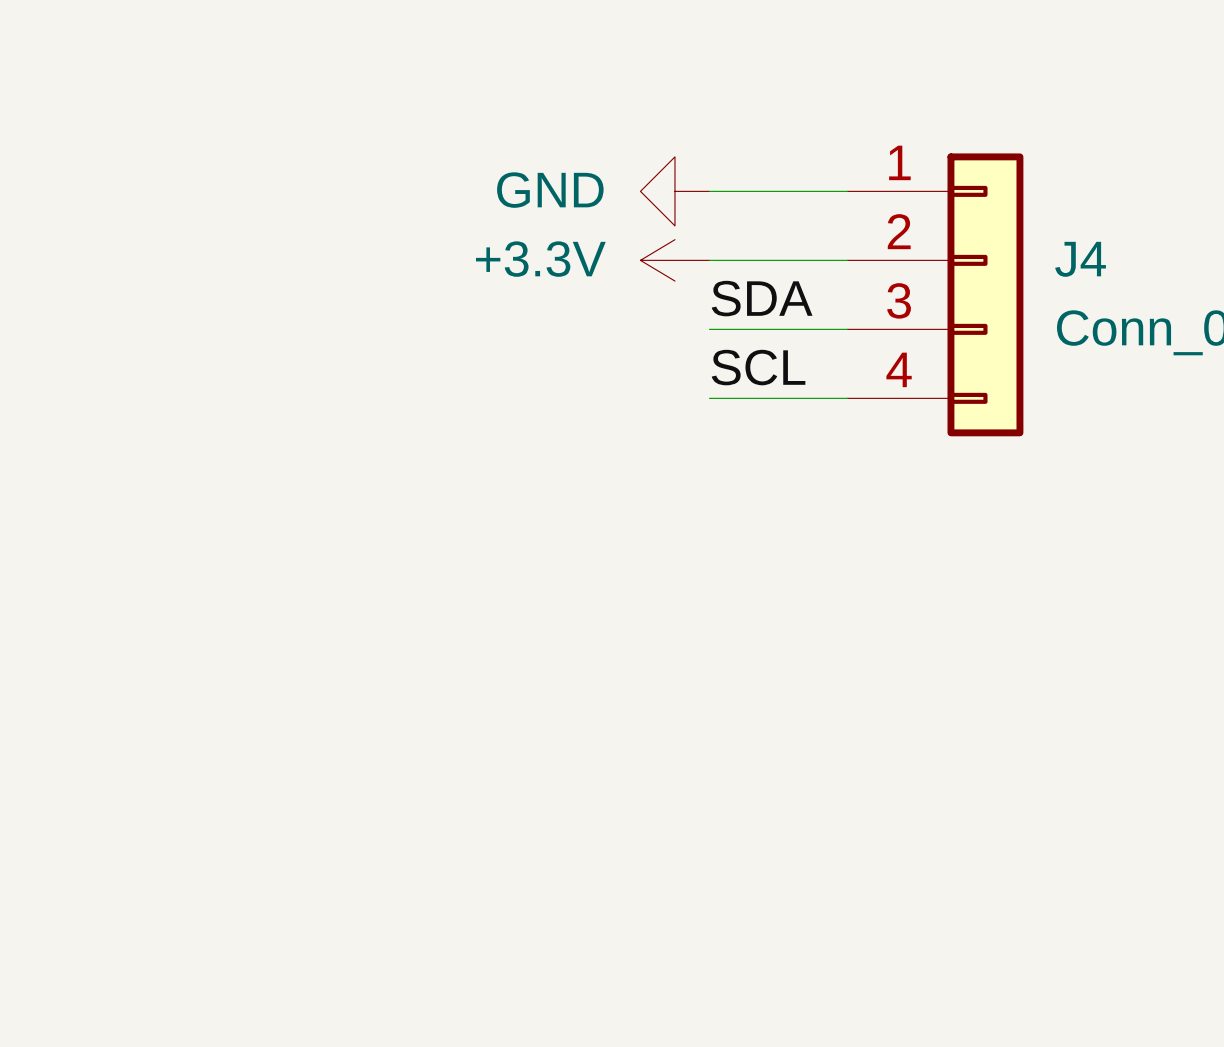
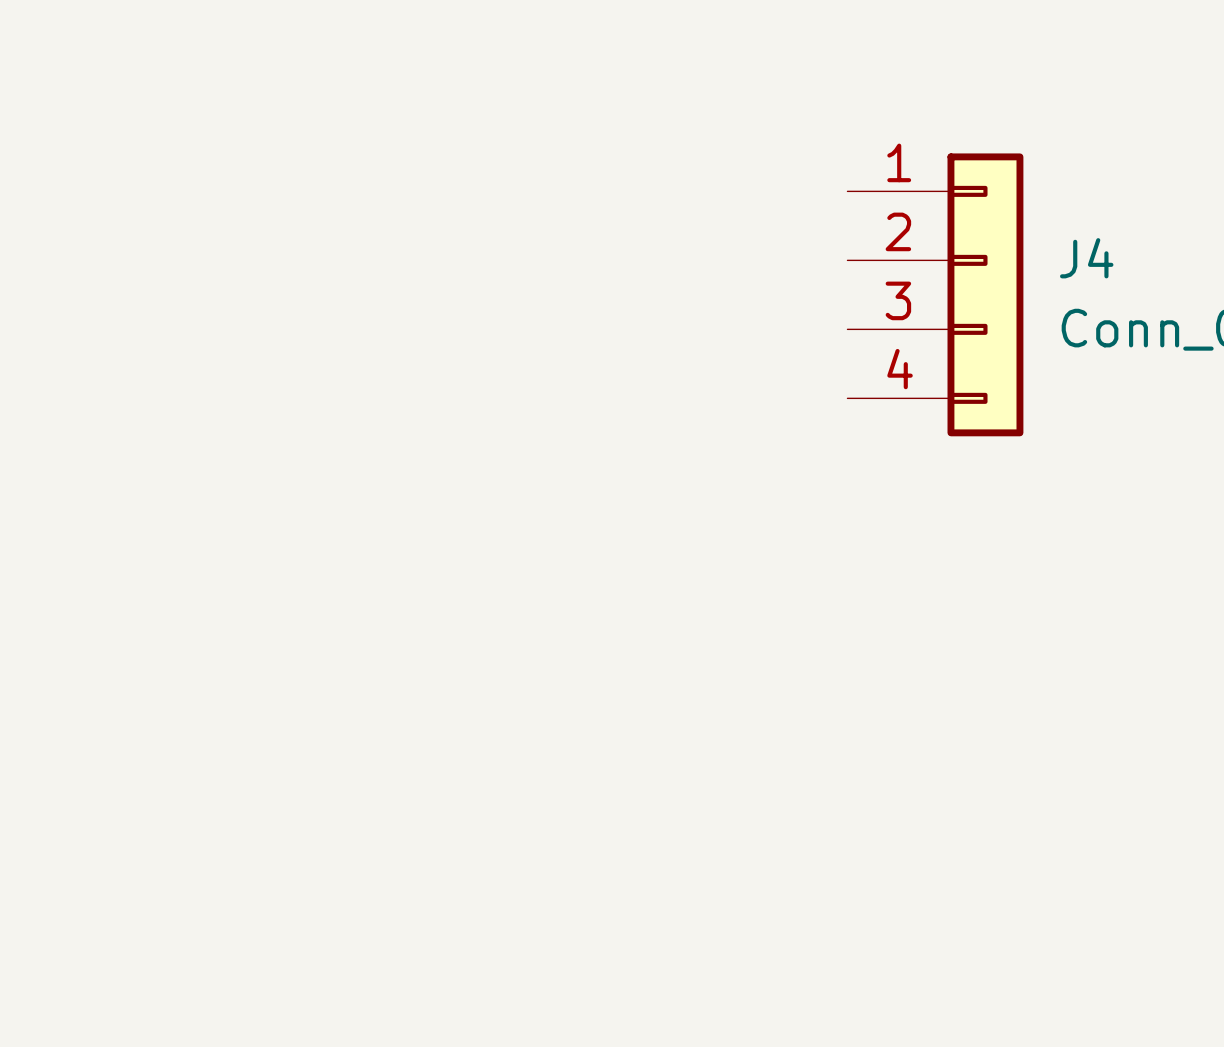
power symbol: GND (674, 191) -> none
wire: (709, 191) (847, 191) -> none
power symbol: +3.3V (674, 260) -> none
wire: (709, 260) (847, 260) -> none
label: SDA (762, 298) -> none
wire: (709, 329) (847, 329) -> none
label: SCL (758, 367) -> none
wire: (709, 398) (847, 398) -> none

